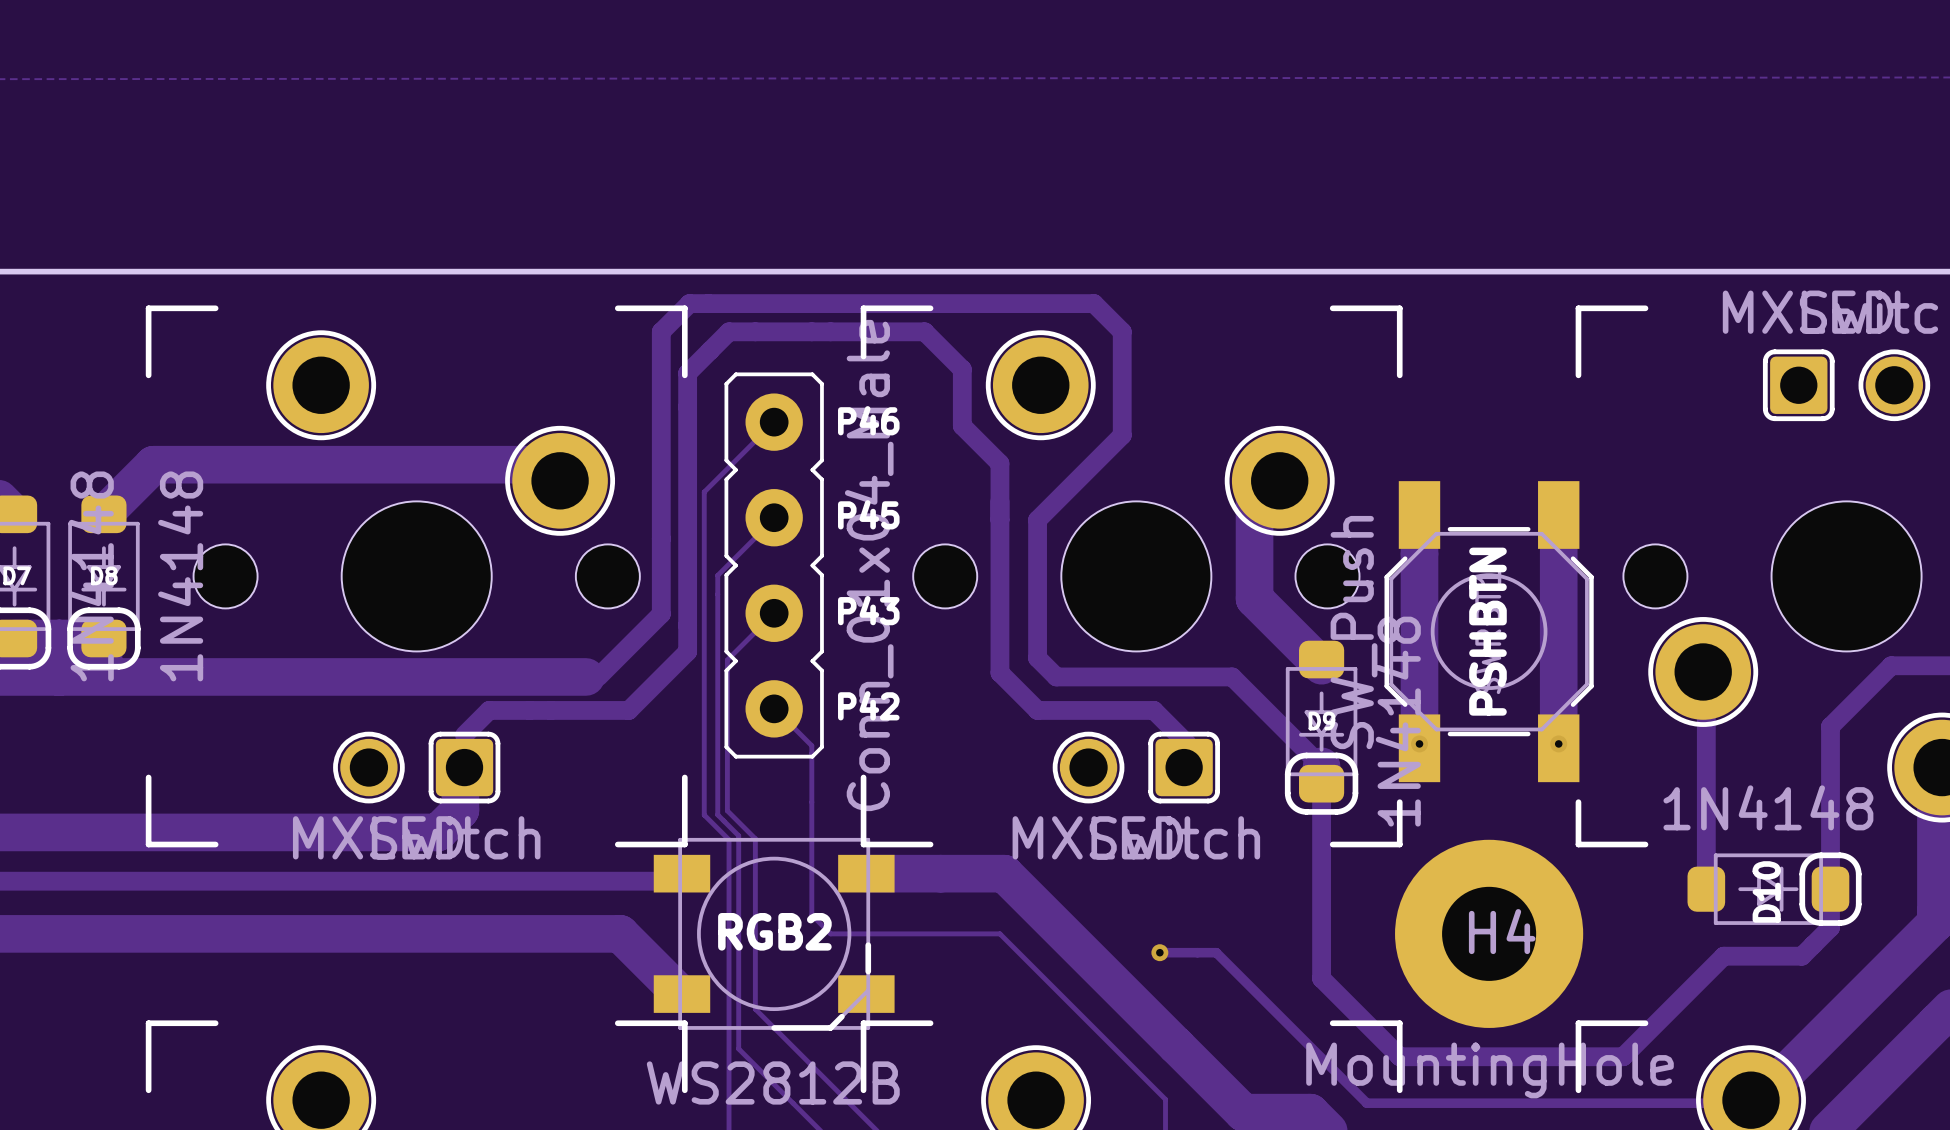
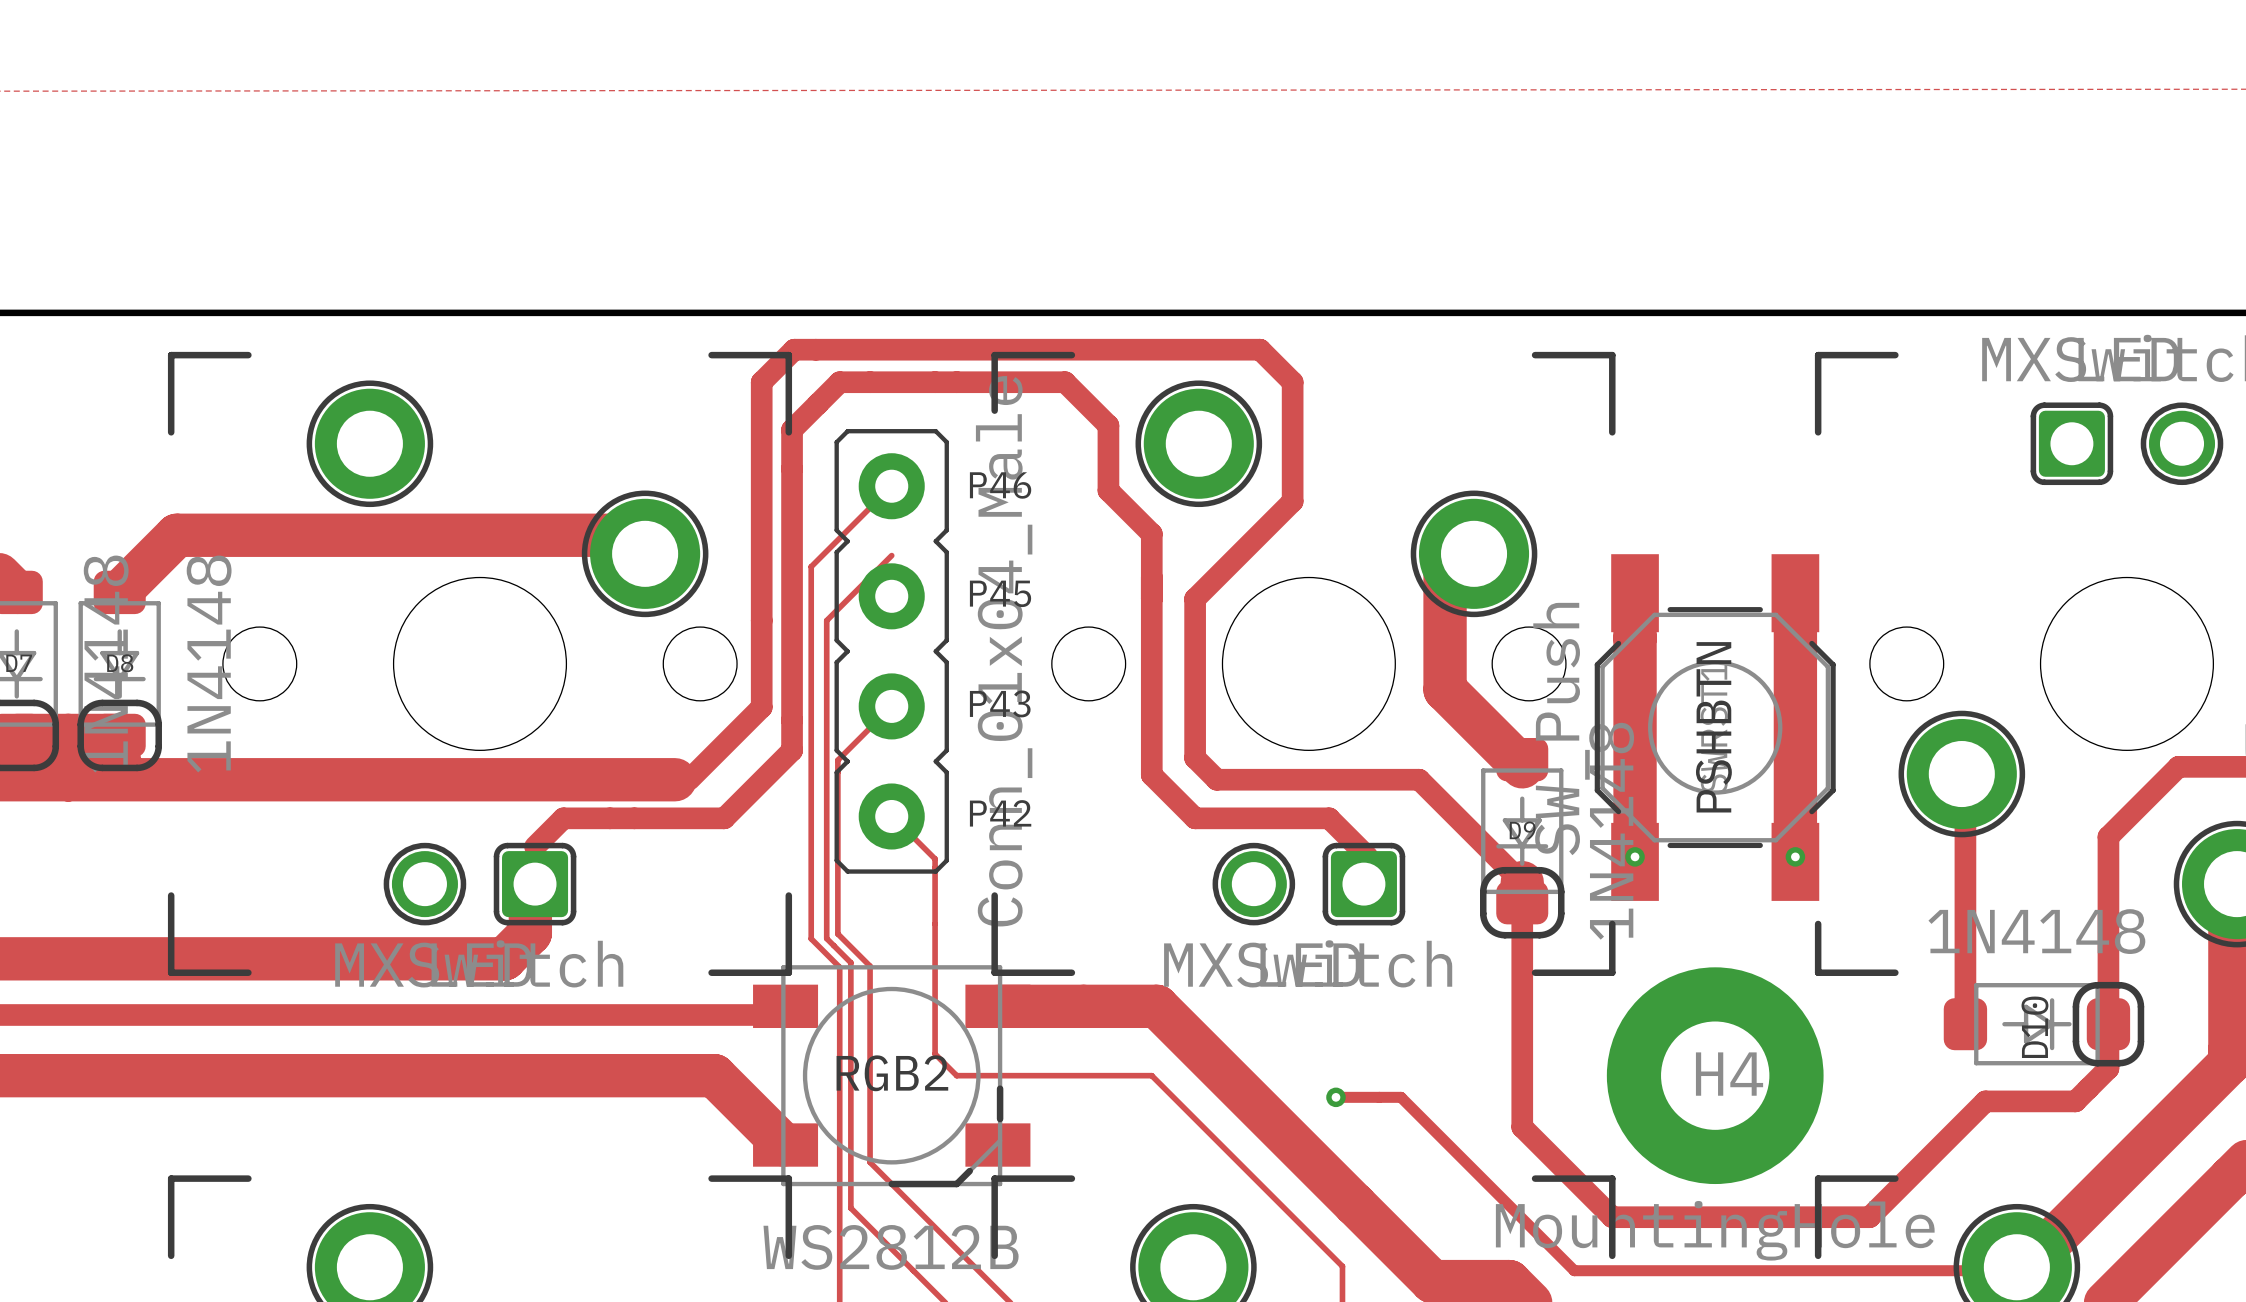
track: (774, 519) (717, 575) -> (891, 555) (826, 620) (826, 662)

